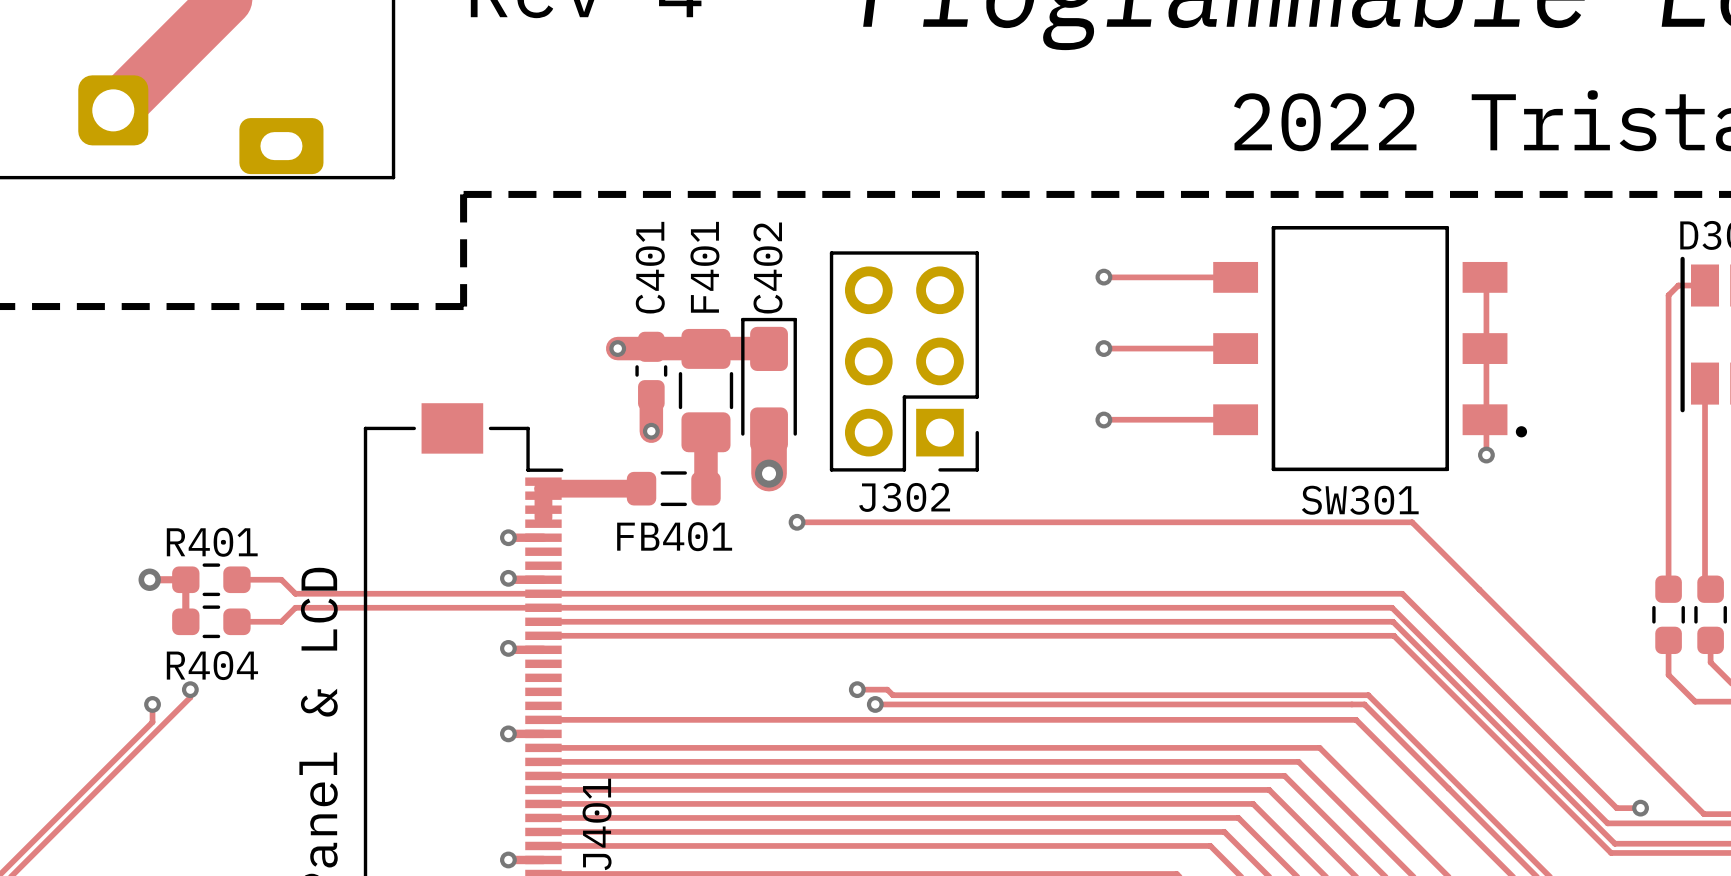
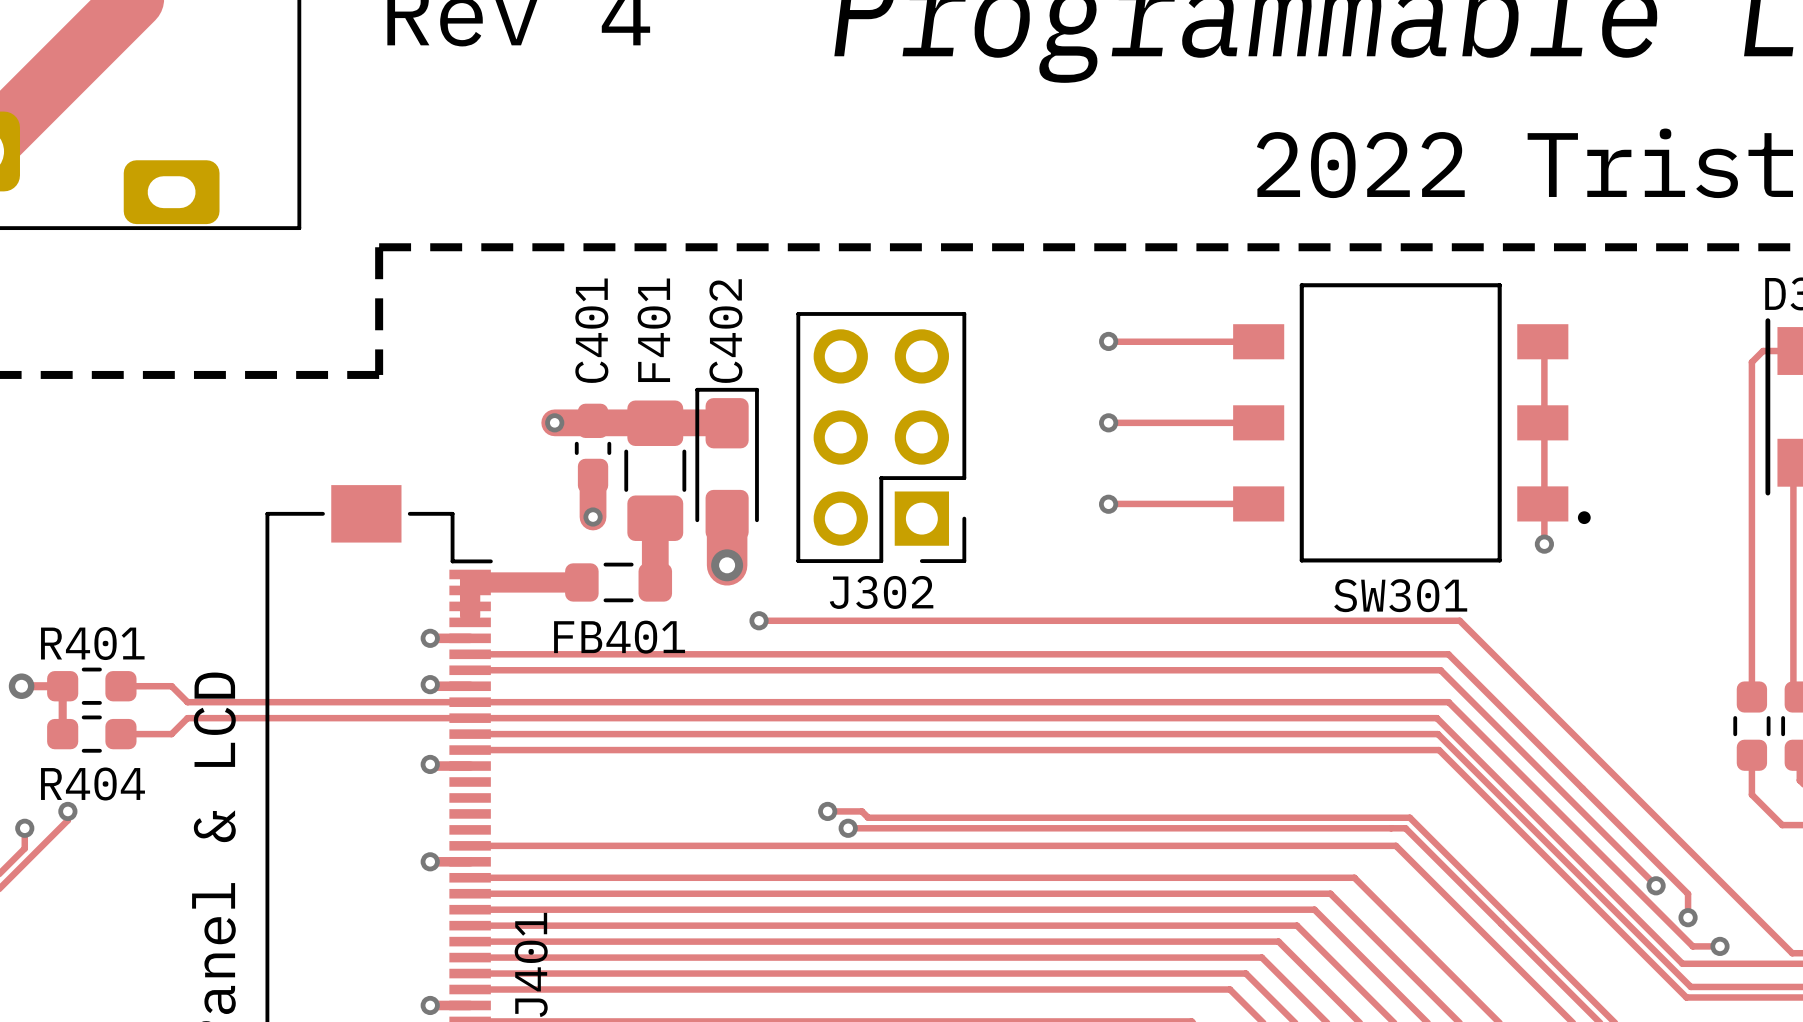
track: none -> (470, 654) (1448, 654) (1688, 893) (1688, 917)
track: none -> (470, 670) (1440, 670) (1656, 885)
via: none -> (1656, 885)
via: none -> (1688, 917)

